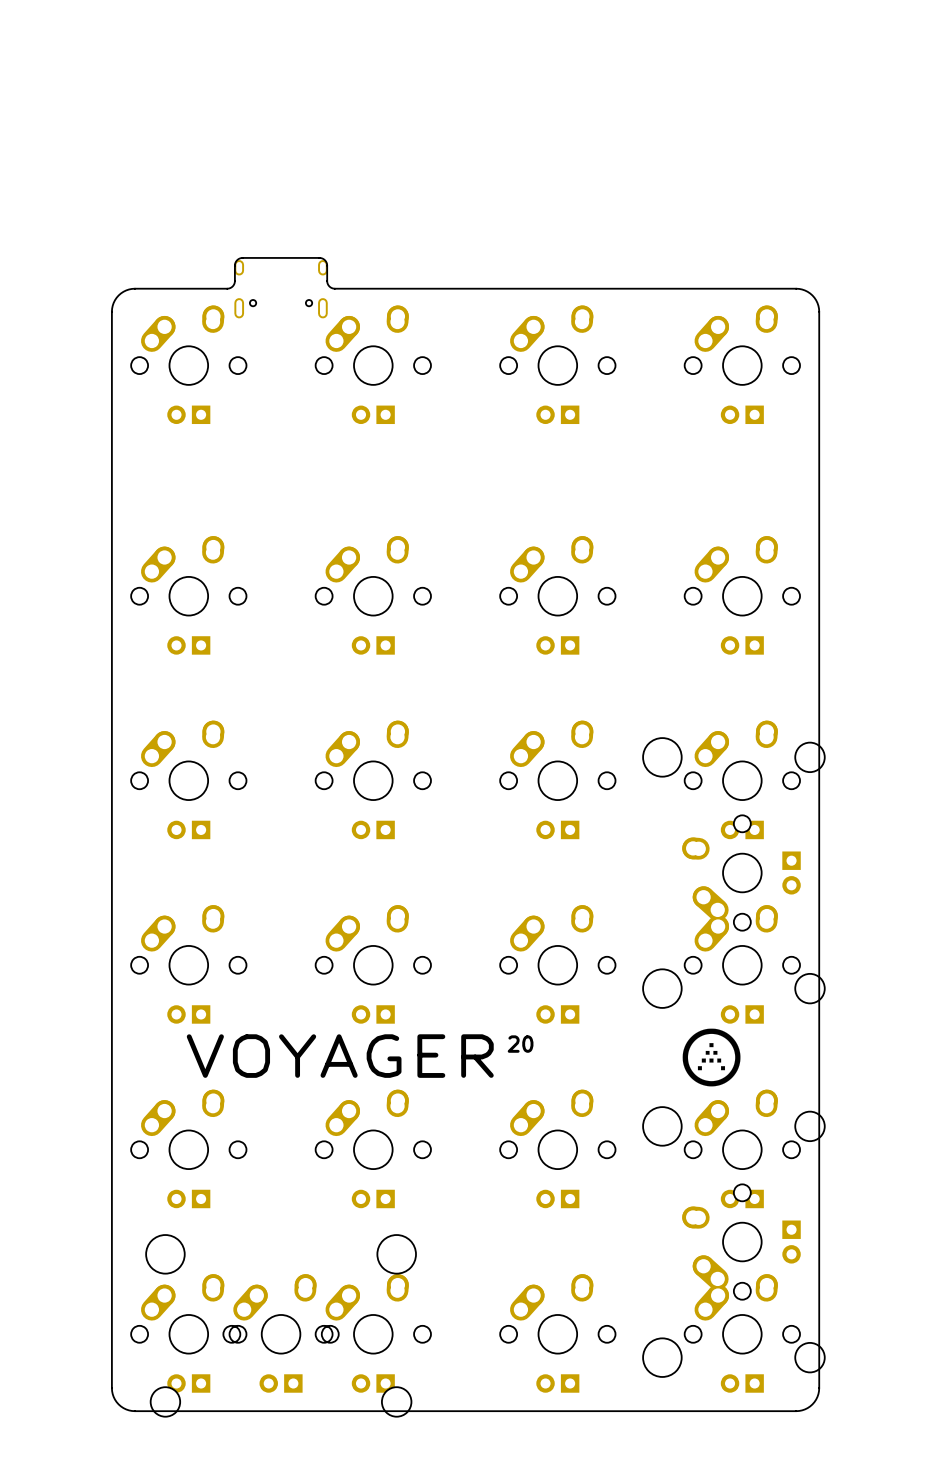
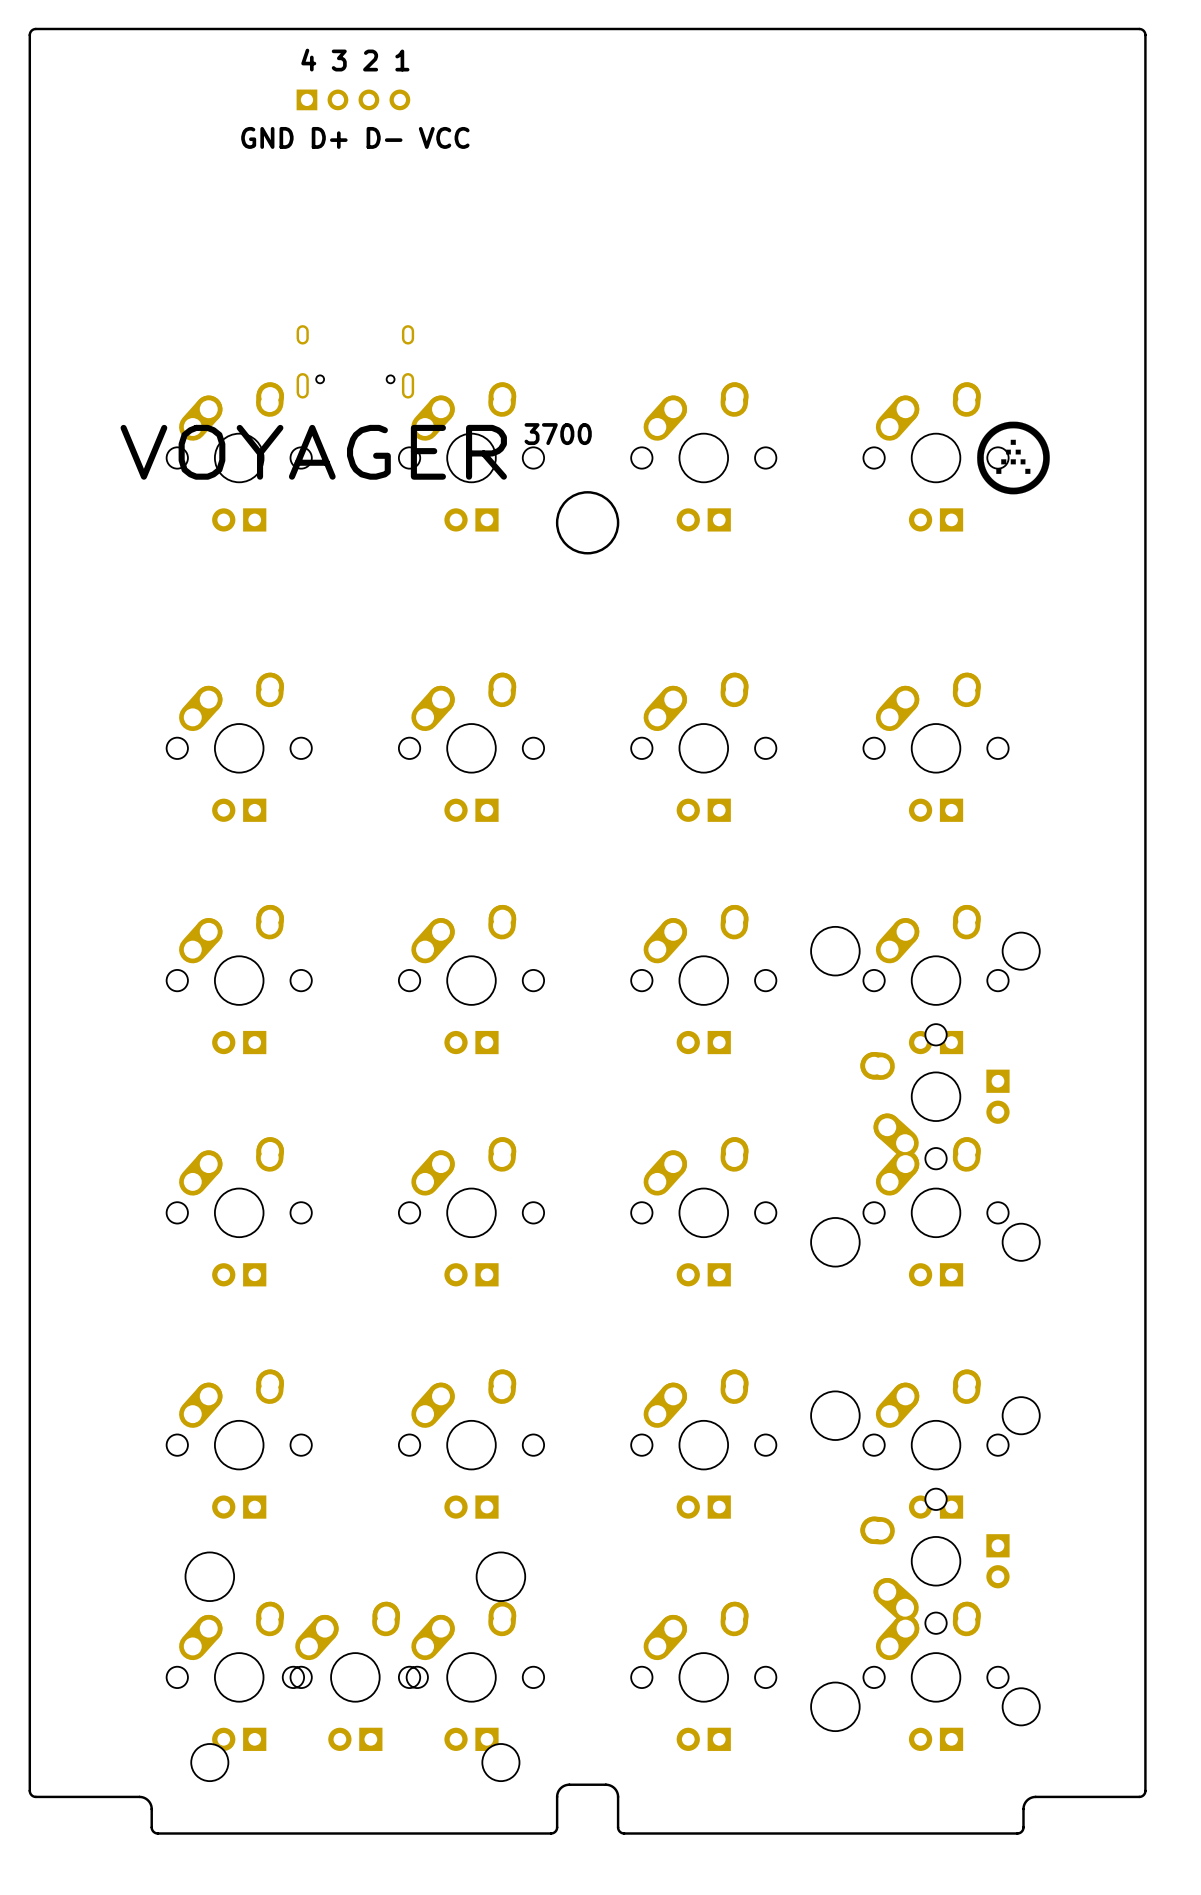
drawing: none -> [28, 27, 1147, 1835]
text: none -> 4 3 2 1 (355, 60)
part: none -> (353, 99)
text: none -> GND D+ D- VCC (355, 137)
text: none -> 3700 (558, 434)
text: none -> VOYAGER (313, 452)
drawing: [682, 1028, 741, 1087] -> none
text: 20 (520, 1044) -> none
text: VOYAGER (340, 1056) -> none
board edge: (134, 1411) (126, 1409) (118, 1404) (113, 1396) (111, 1388) (111, 311) (115, 300) (123, 291) (131, 288) (229, 288) (234, 283) (235, 262) (242, 257) (321, 258) (326, 263) (327, 283) (334, 288) (796, 288) (807, 291) (816, 300) (819, 311) (819, 1388) (816, 1399) (807, 1408) (796, 1411) (134, 1411) -> none

